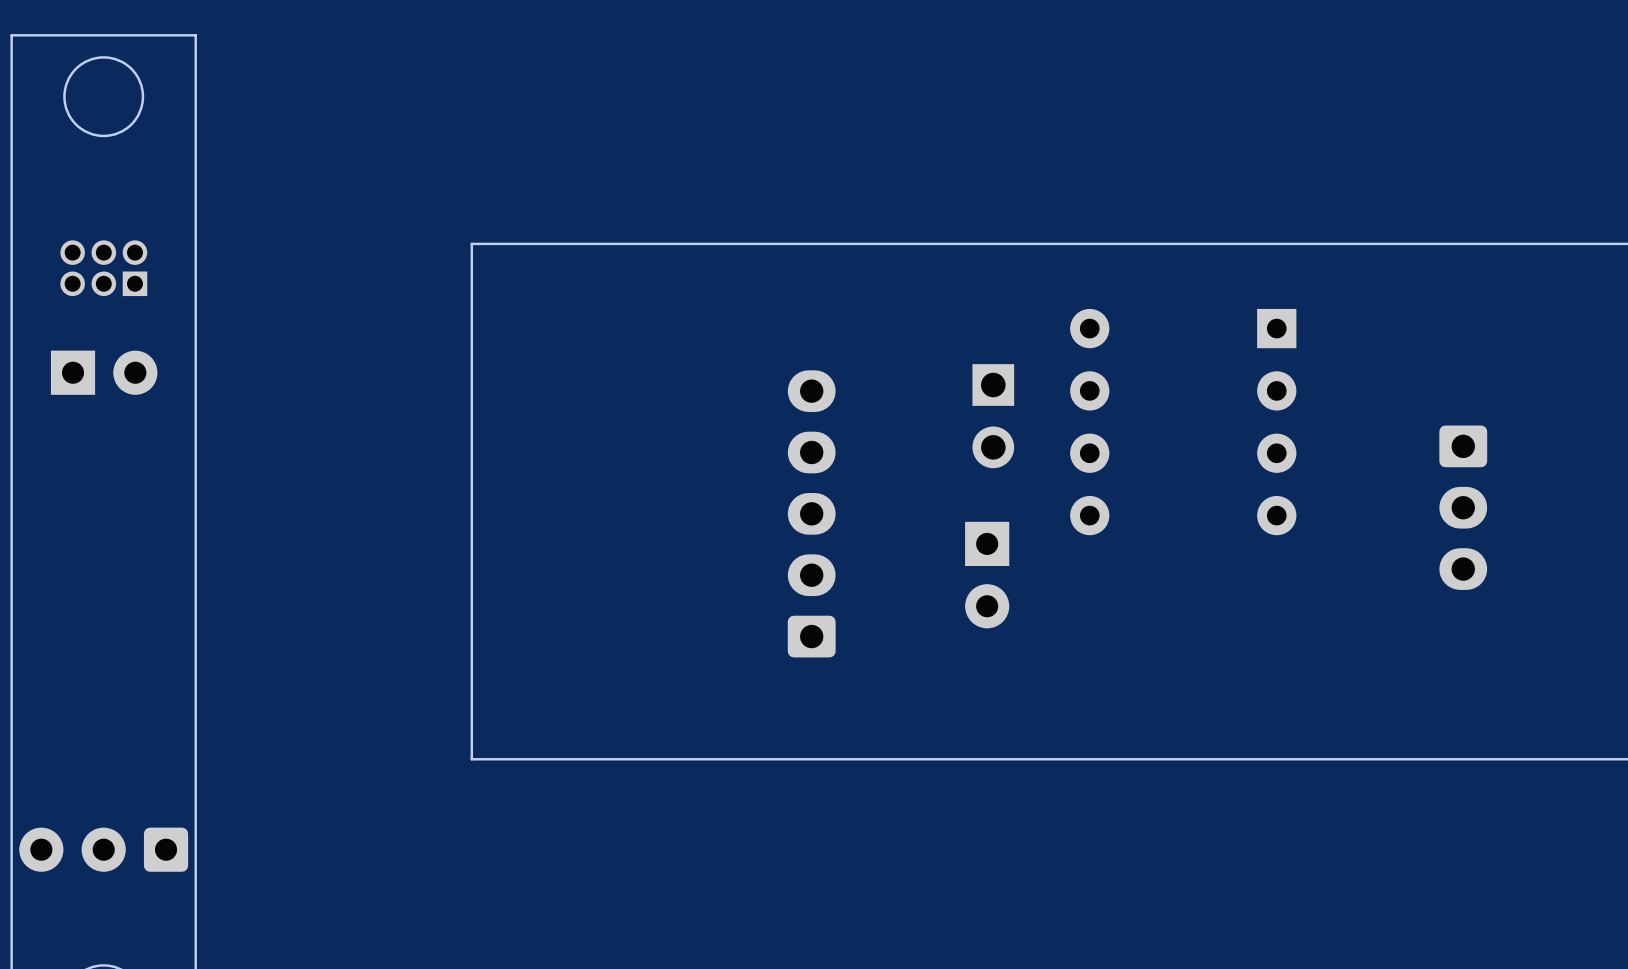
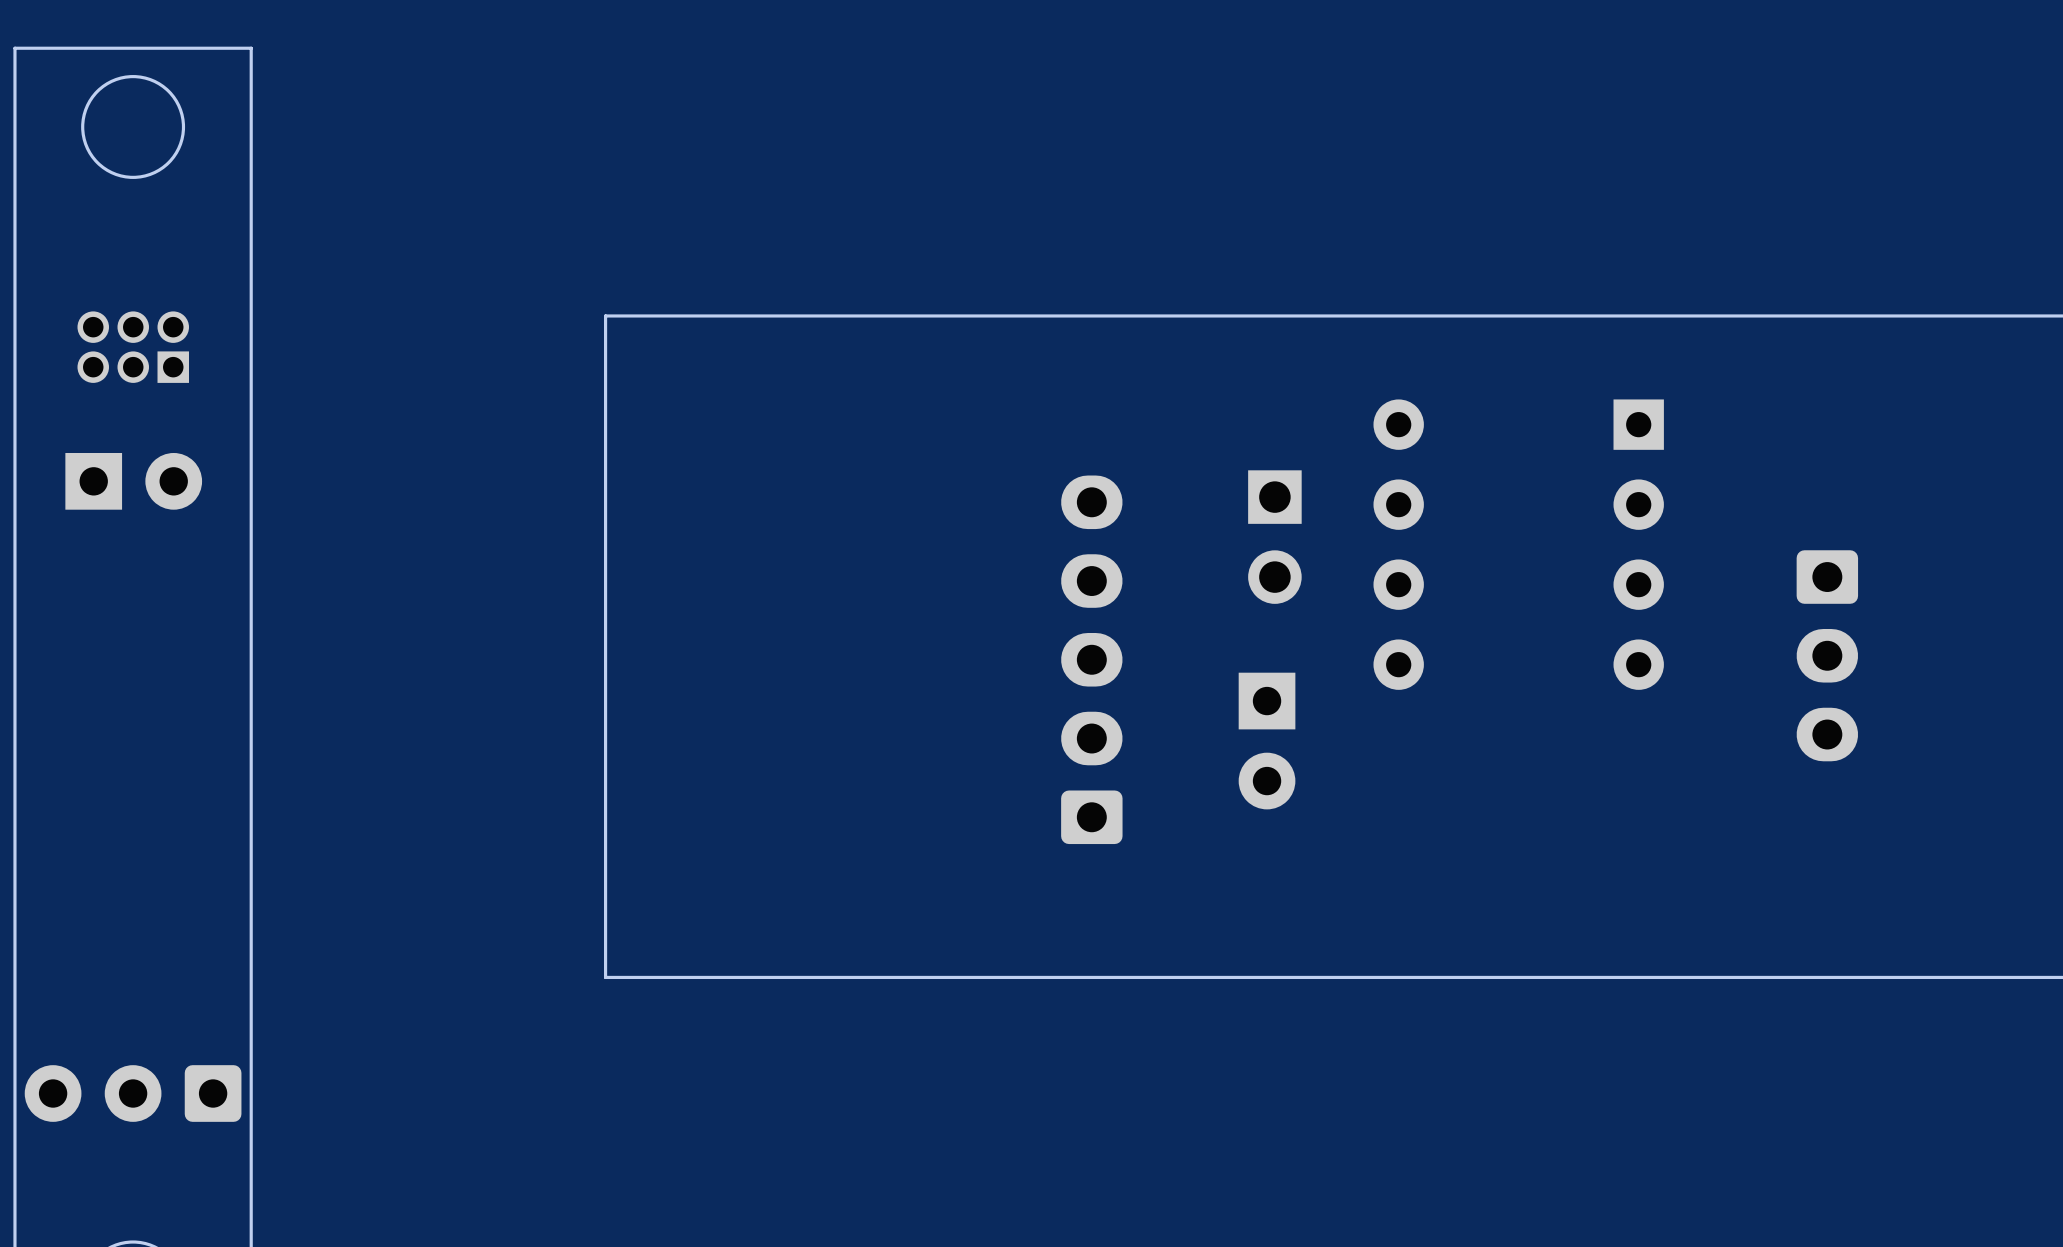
part position: (1463, 507) -> (1827, 655)
part position: (811, 513) -> (1091, 659)

